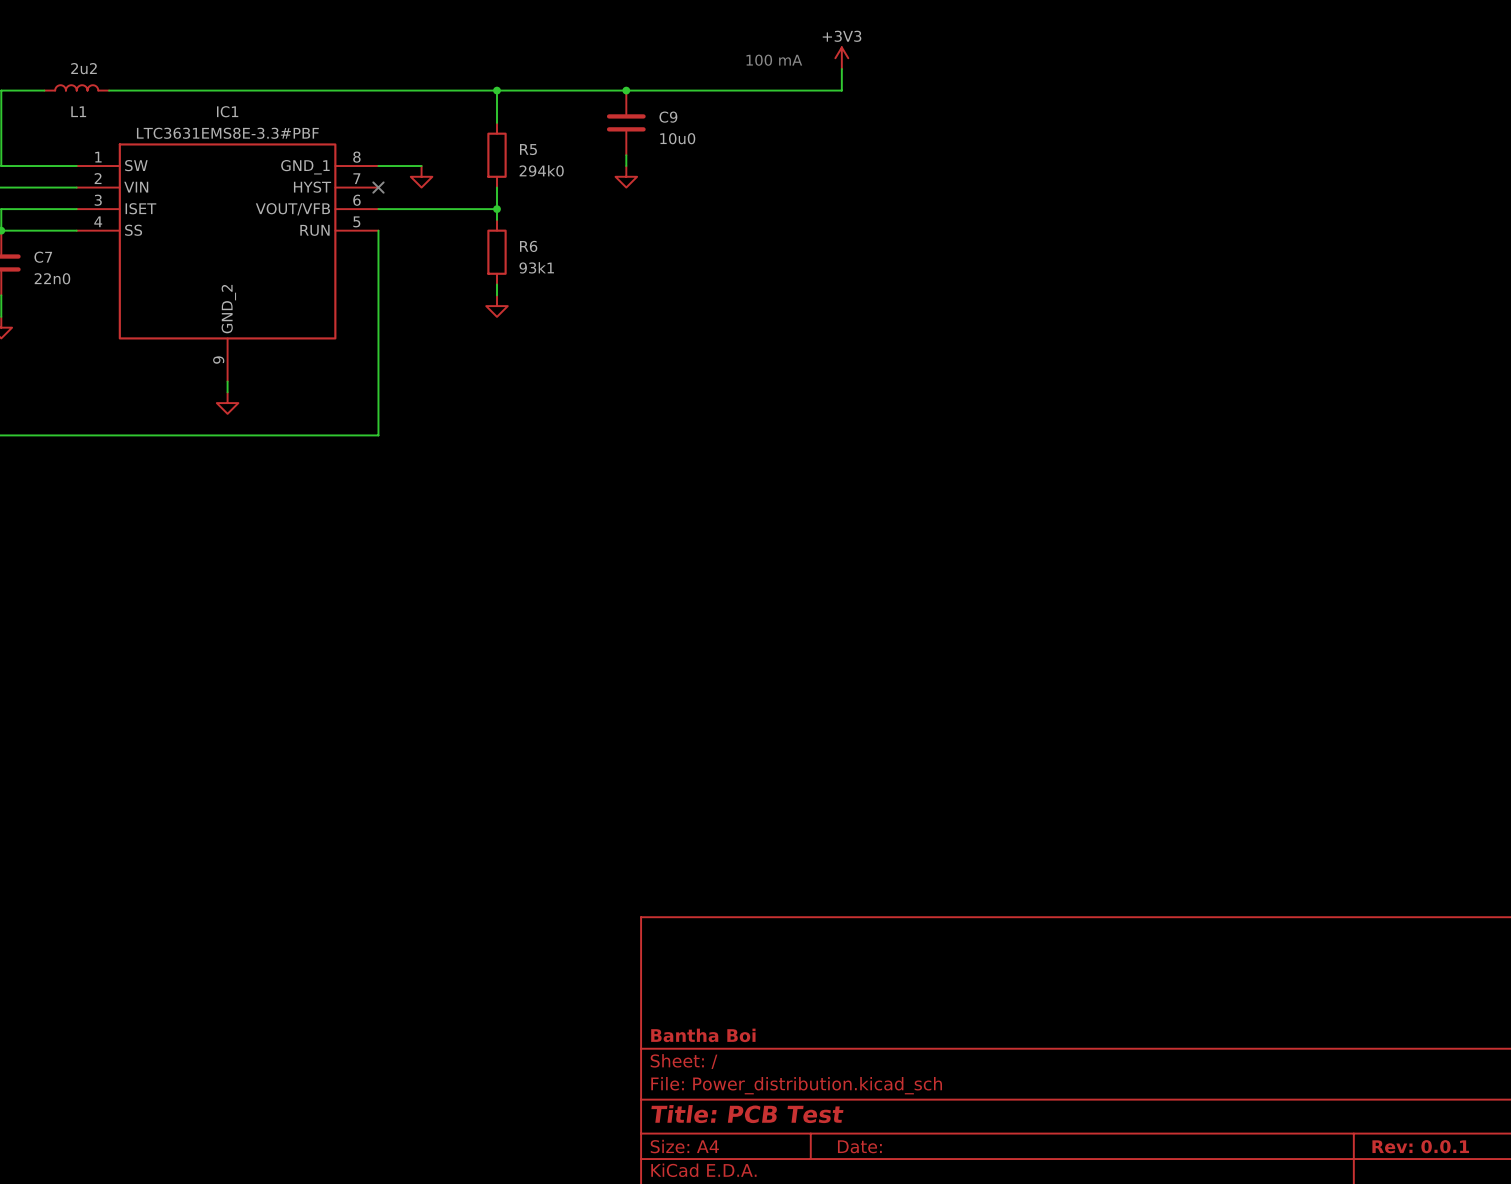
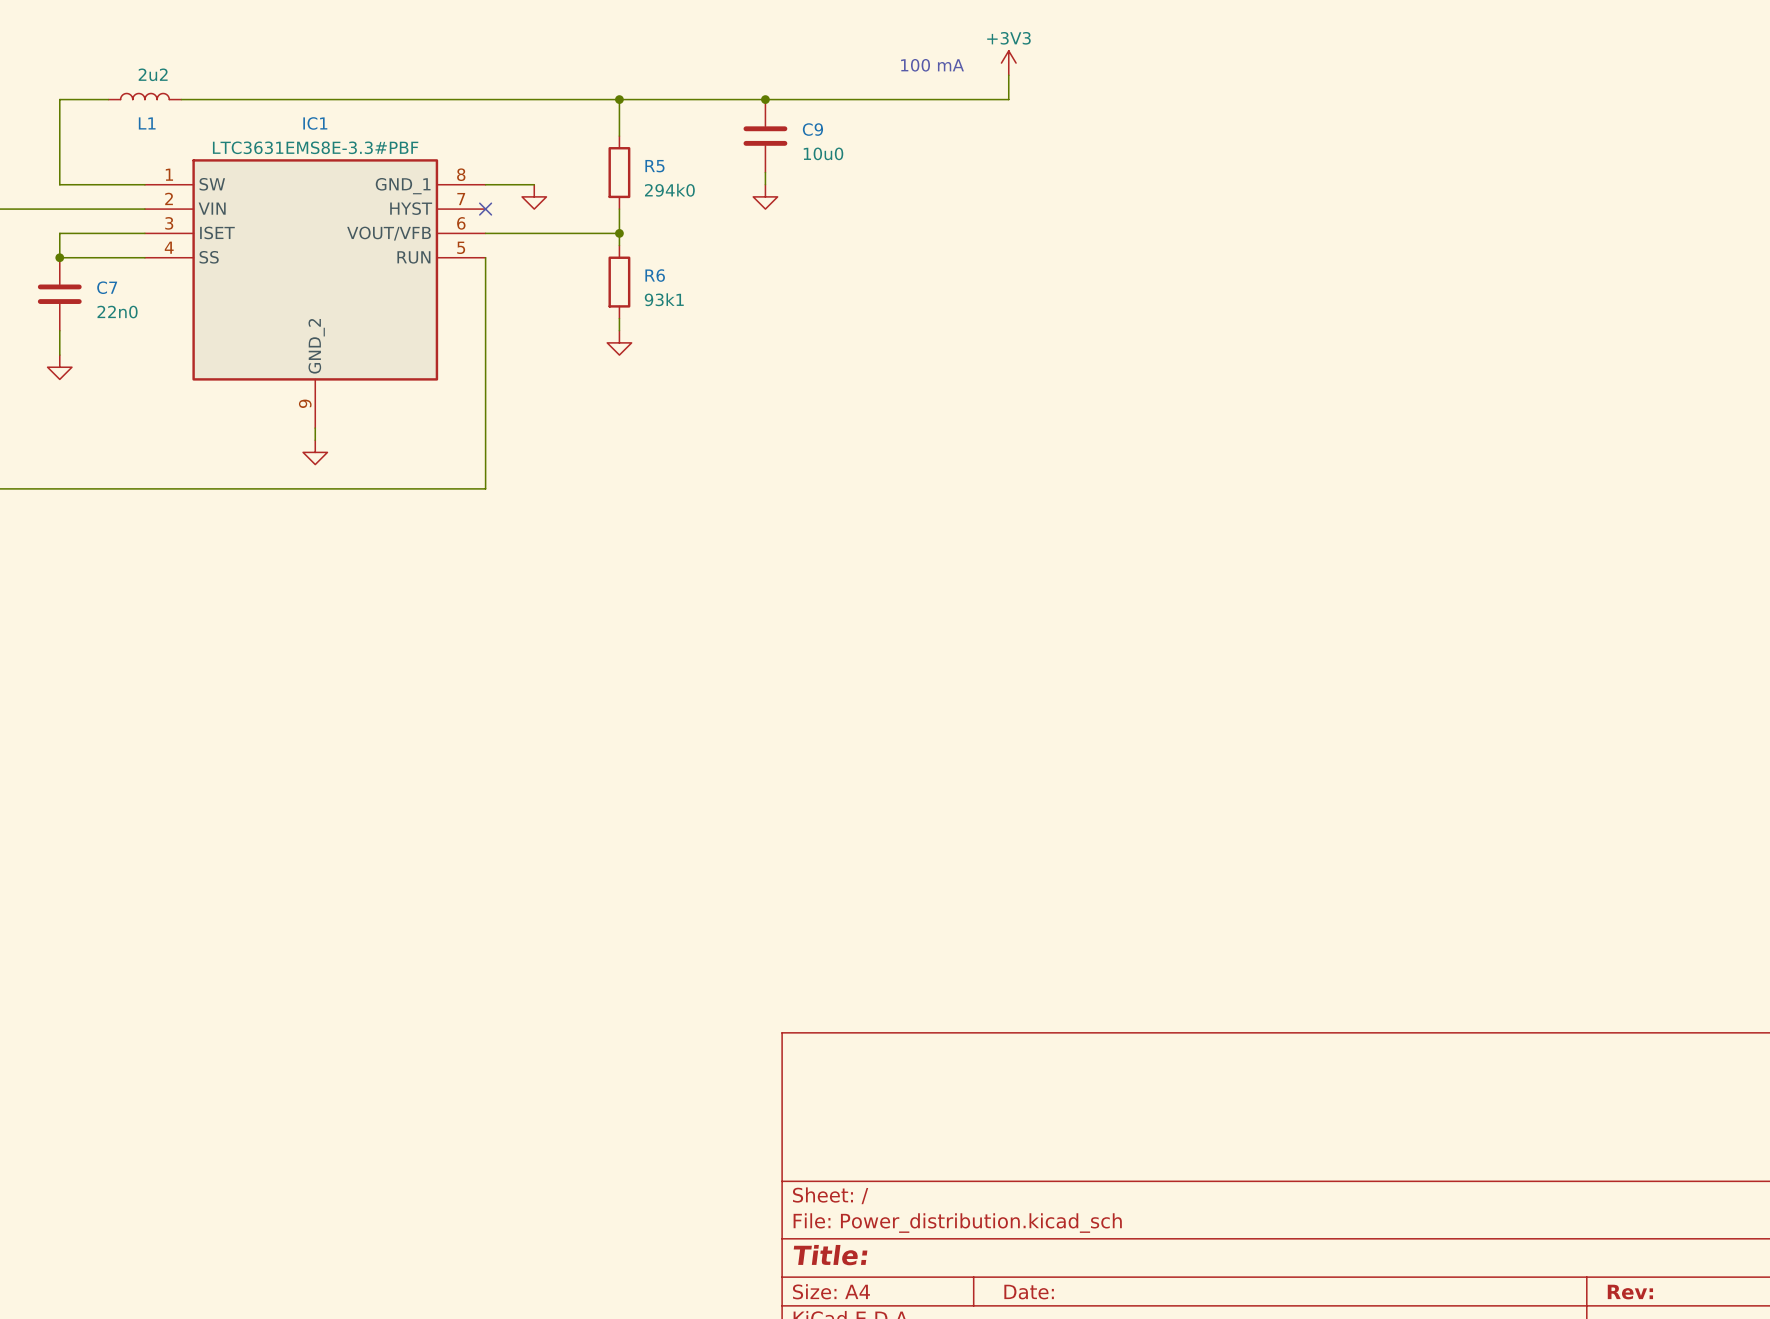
title block: Bantha Boi (703, 1035) -> none
title block: Title: PCB Test (747, 1114) -> Title: (830, 1255)
title block: Rev: 0.0.1 (1420, 1146) -> Rev: (1630, 1292)

